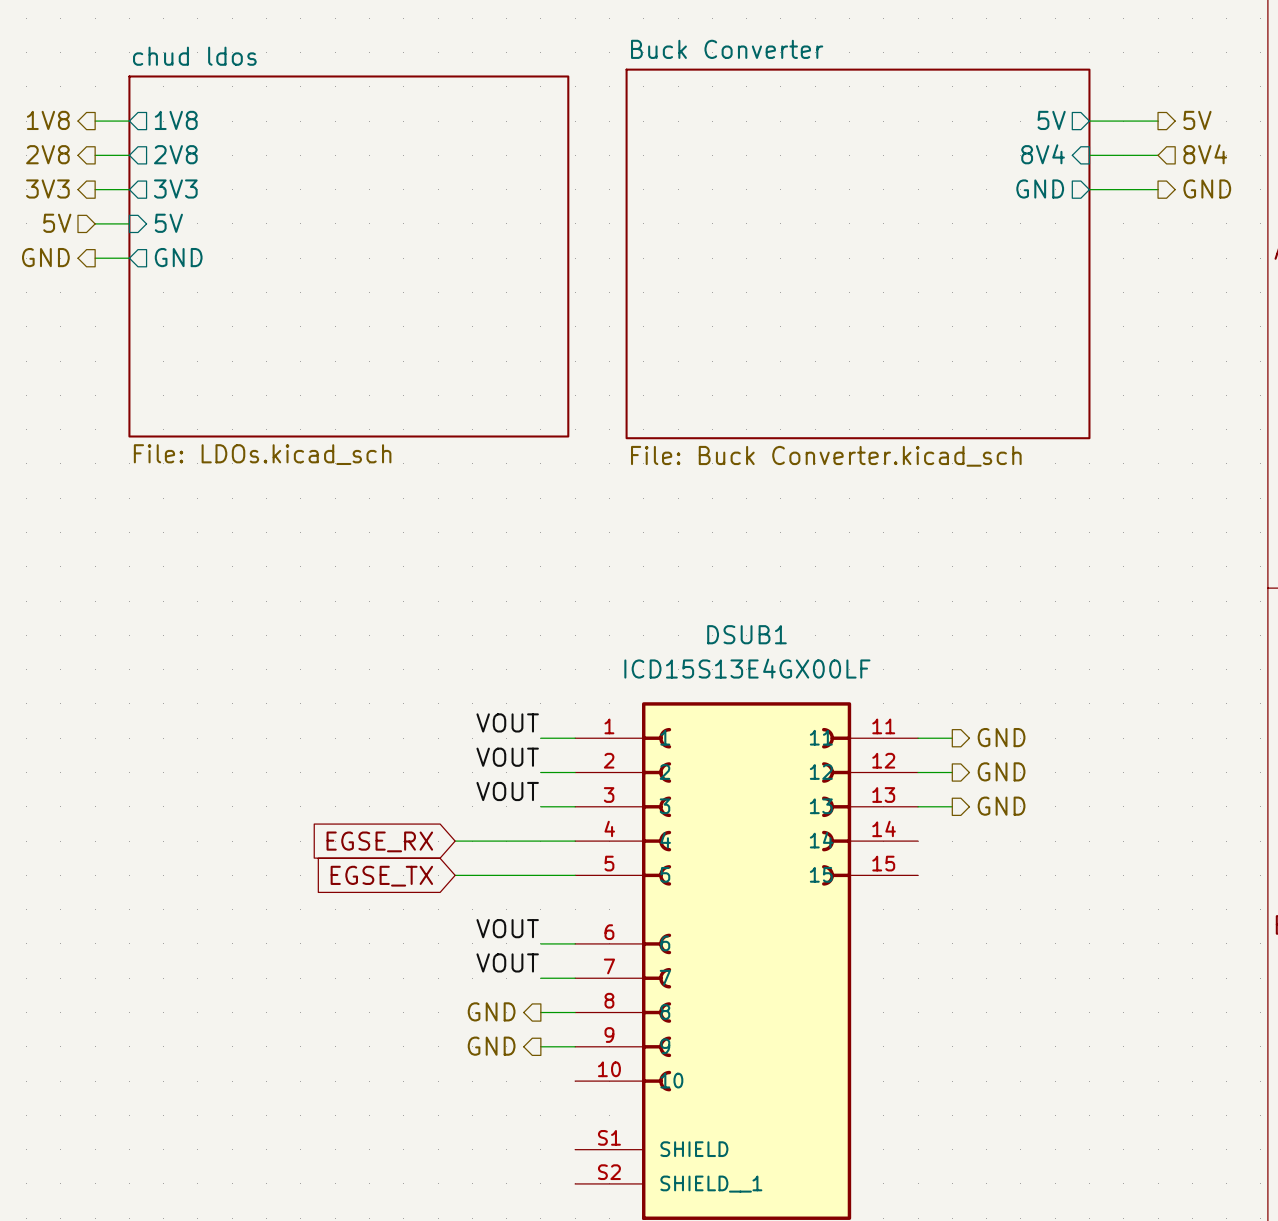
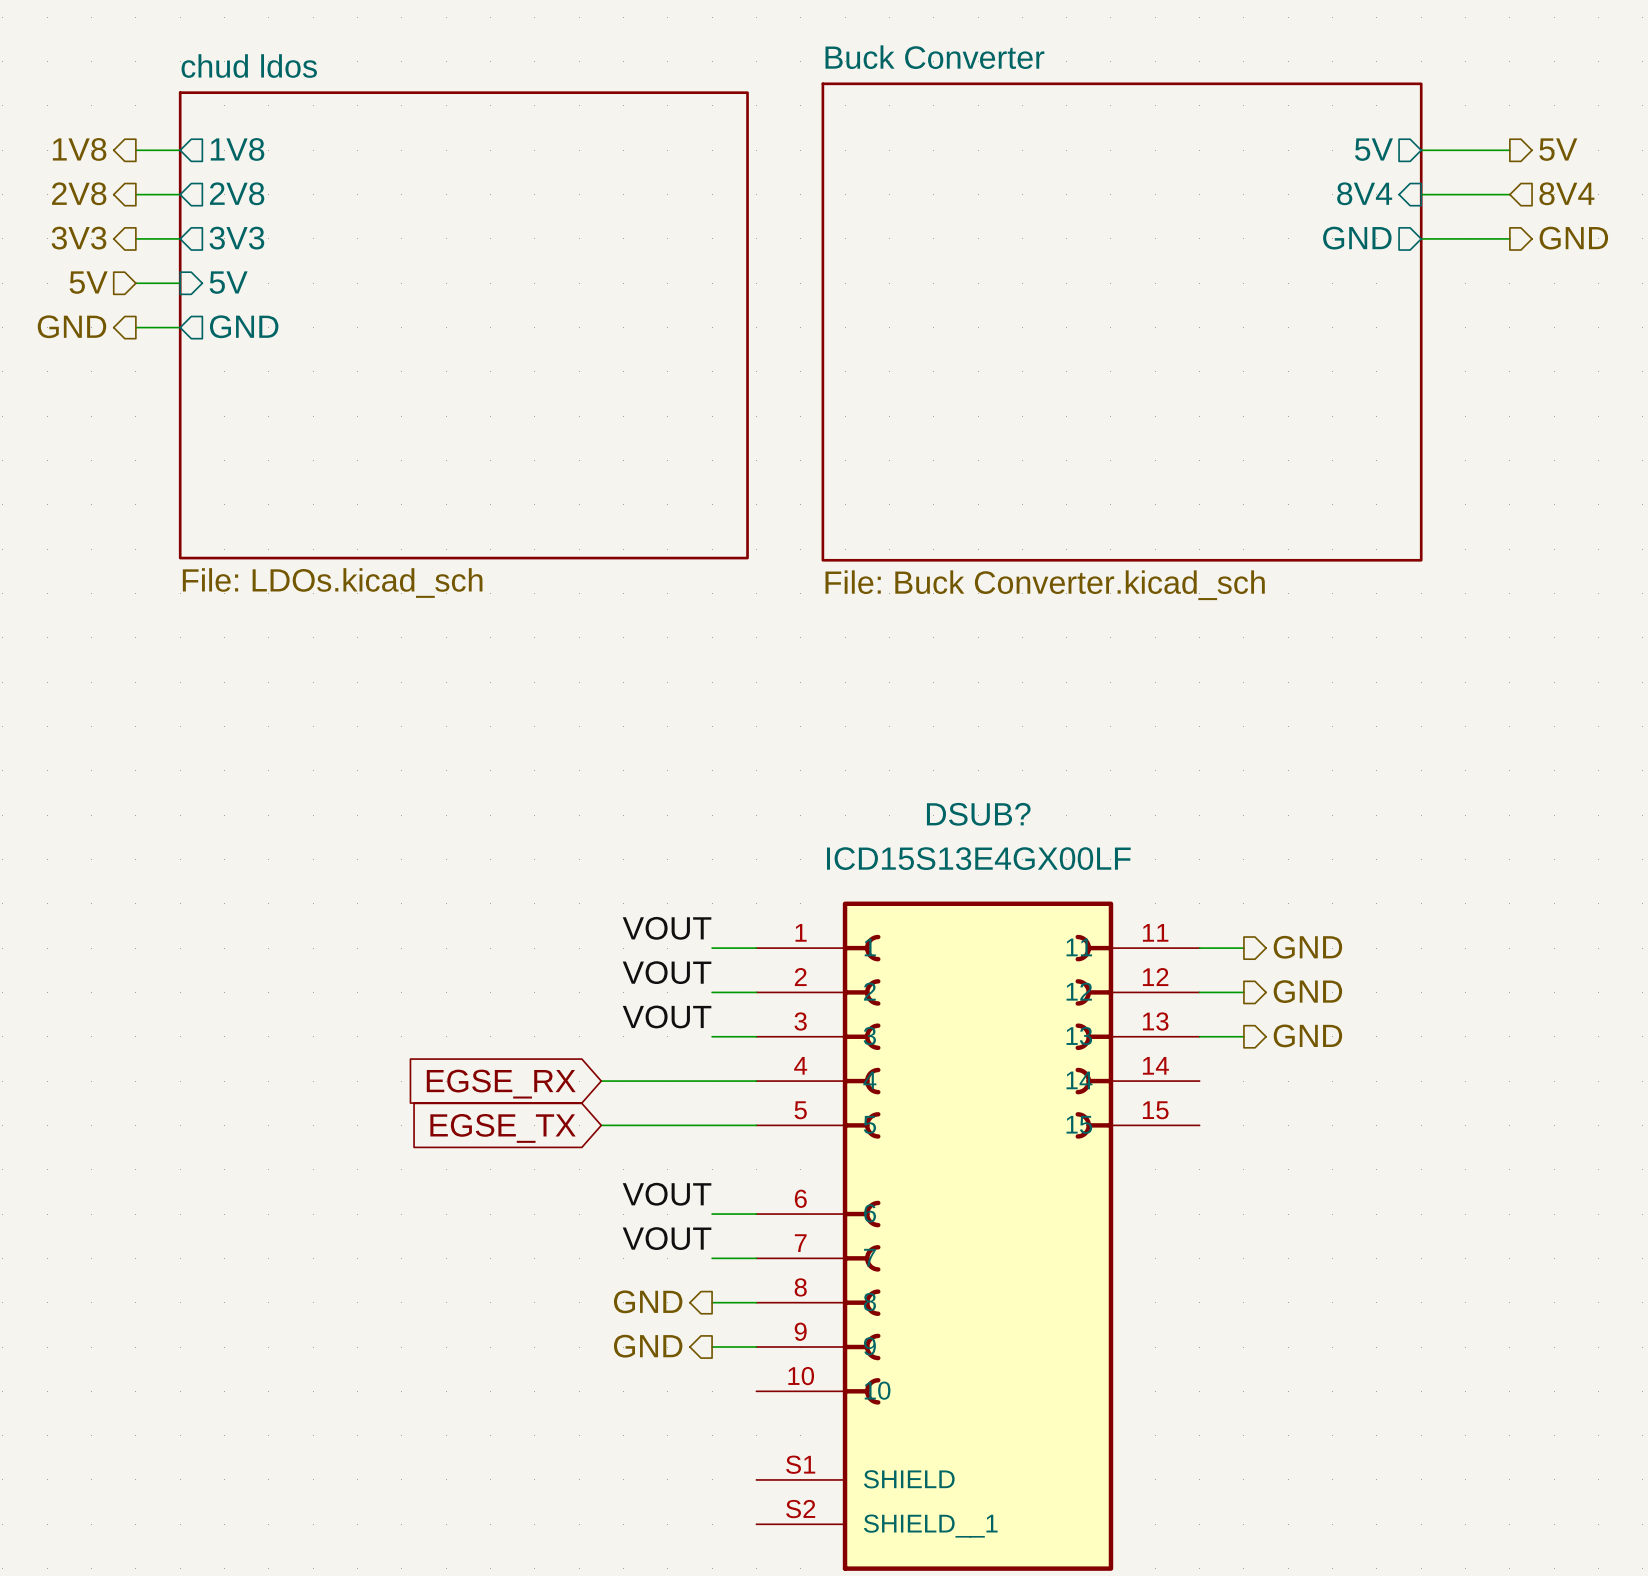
DSUB1 name: DSUB1 (746, 634) -> DSUB? (978, 814)

